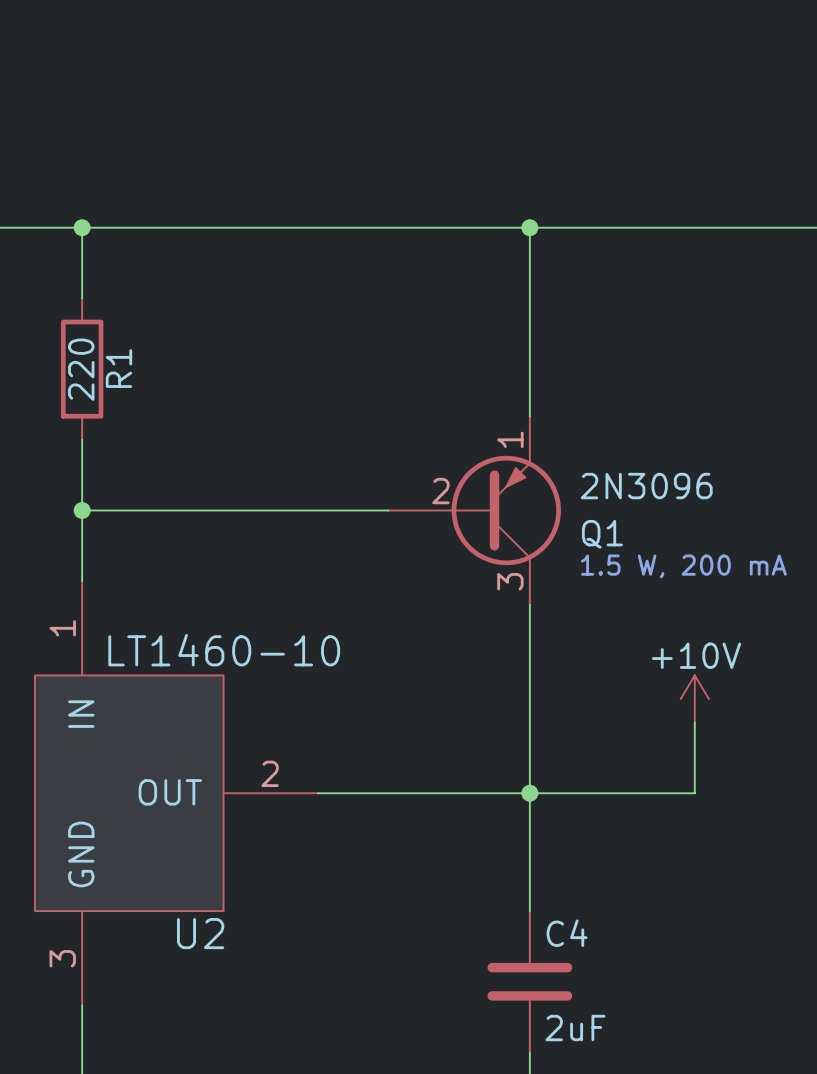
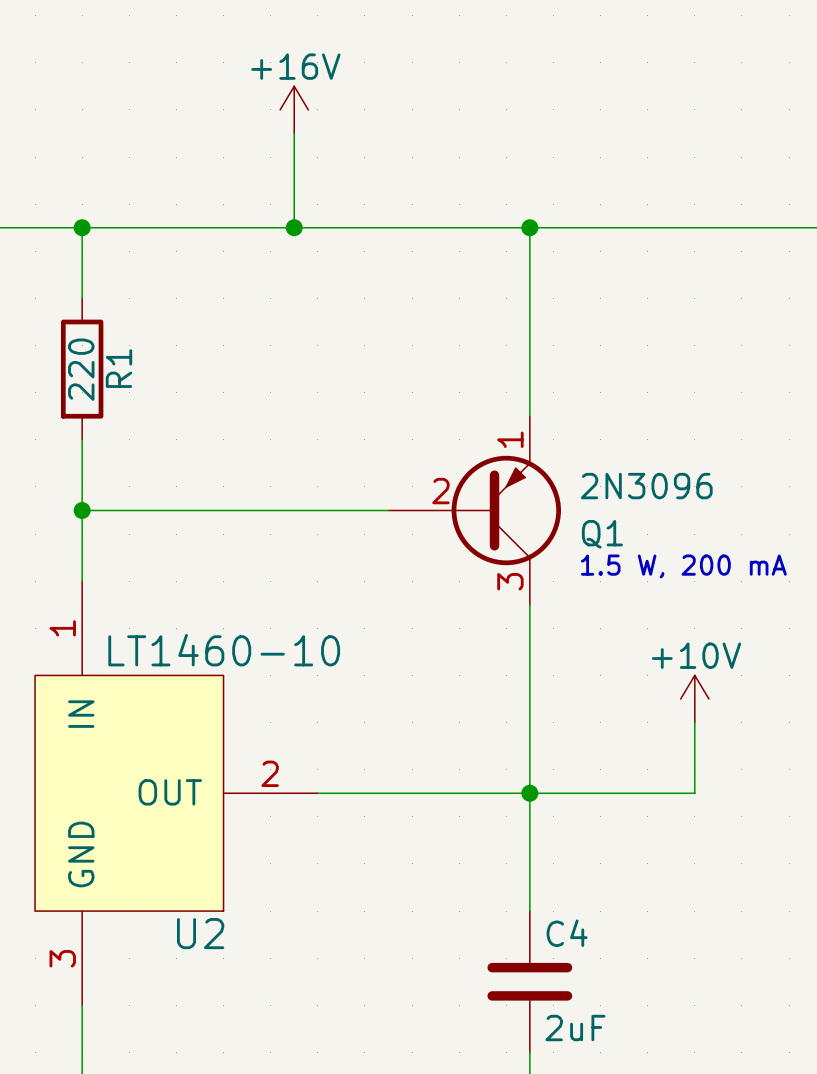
power symbol: none -> +16V (294, 109)
wire: none -> (294, 133) (294, 227)
junction: none -> (294, 227)

